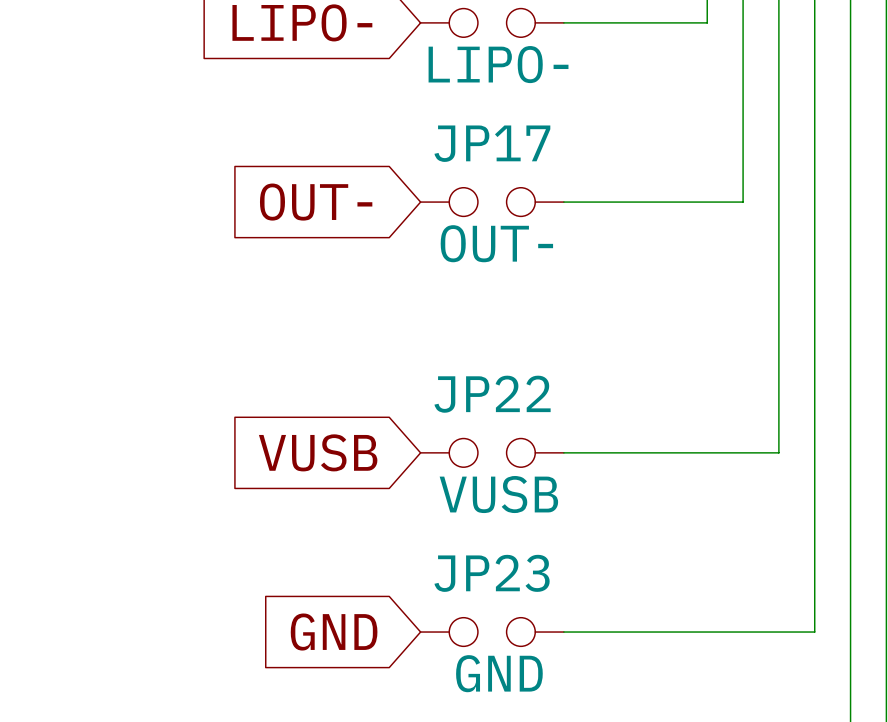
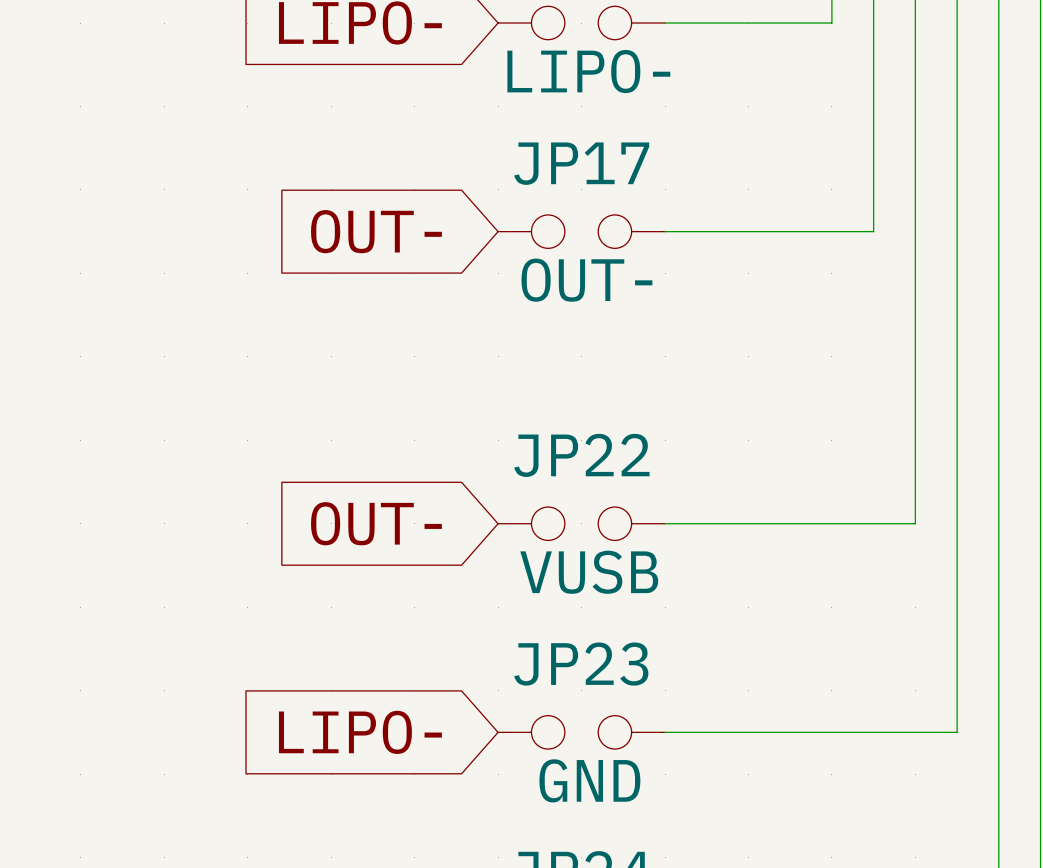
global label: VUSB (318, 452) -> OUT- (376, 523)
global label: GND (334, 632) -> LIPO- (360, 732)

